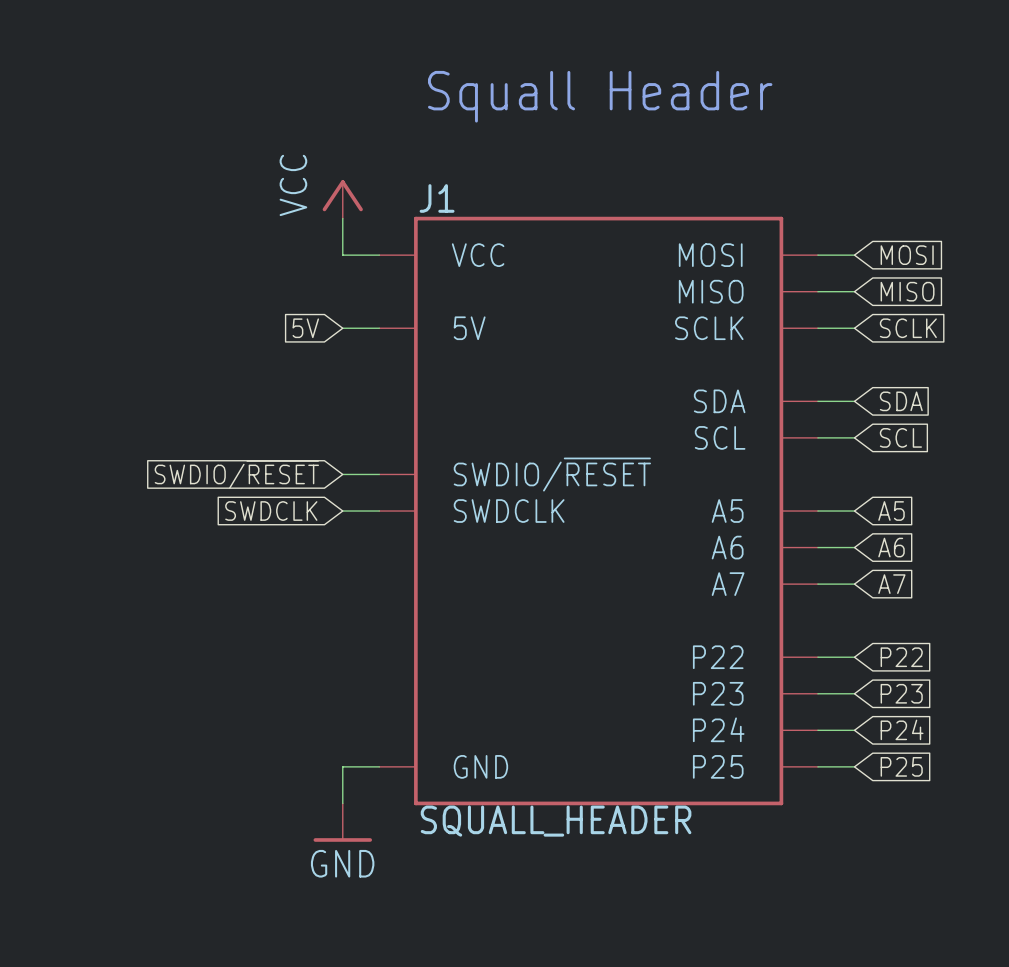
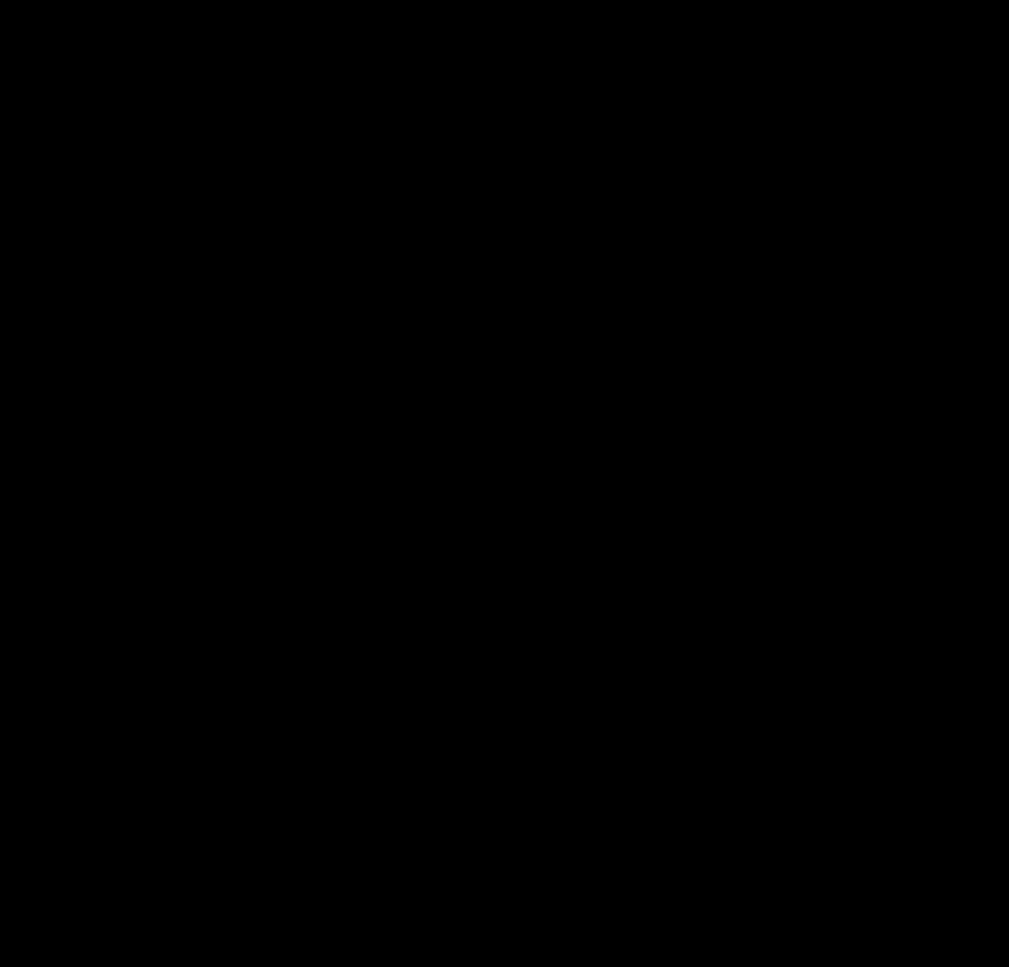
text: Squall Header (600, 96) -> none
power symbol: VCC (342, 199) -> none
wire: (342, 218) (342, 255) (379, 255) -> none
wire: (817, 255) (854, 255) -> none
global label: MOSI (907, 255) -> none
wire: (817, 291) (854, 291) -> none
global label: MISO (907, 291) -> none
global label: 5V (305, 328) -> none
wire: (342, 328) (379, 328) -> none
wire: (817, 328) (854, 328) -> none
global label: SCLK (908, 328) -> none
wire: (817, 401) (854, 401) -> none
global label: SDA (901, 401) -> none
wire: (817, 437) (854, 437) -> none
global label: SCL (900, 437) -> none
global label: SWDIO/~{RESET} (236, 474) -> none
wire: (342, 474) (379, 474) -> none
global label: SWDCLK (271, 511) -> none
wire: (342, 511) (379, 511) -> none
J1: SQUALL_HEADER (598, 511) -> none
wire: (817, 511) (854, 511) -> none
global label: A5 (891, 511) -> none
wire: (817, 547) (854, 547) -> none
global label: A6 (891, 547) -> none
wire: (817, 584) (854, 584) -> none
global label: A7 (891, 584) -> none
wire: (817, 657) (854, 657) -> none
global label: P22 (901, 657) -> none
wire: (817, 693) (854, 693) -> none
global label: P23 (901, 693) -> none
global label: P24 (902, 729) -> none
wire: (817, 730) (854, 730) -> none
wire: (379, 766) (342, 766) (342, 803) -> none
wire: (817, 766) (854, 766) -> none
global label: P25 (901, 766) -> none
power symbol: GND (342, 822) -> none

